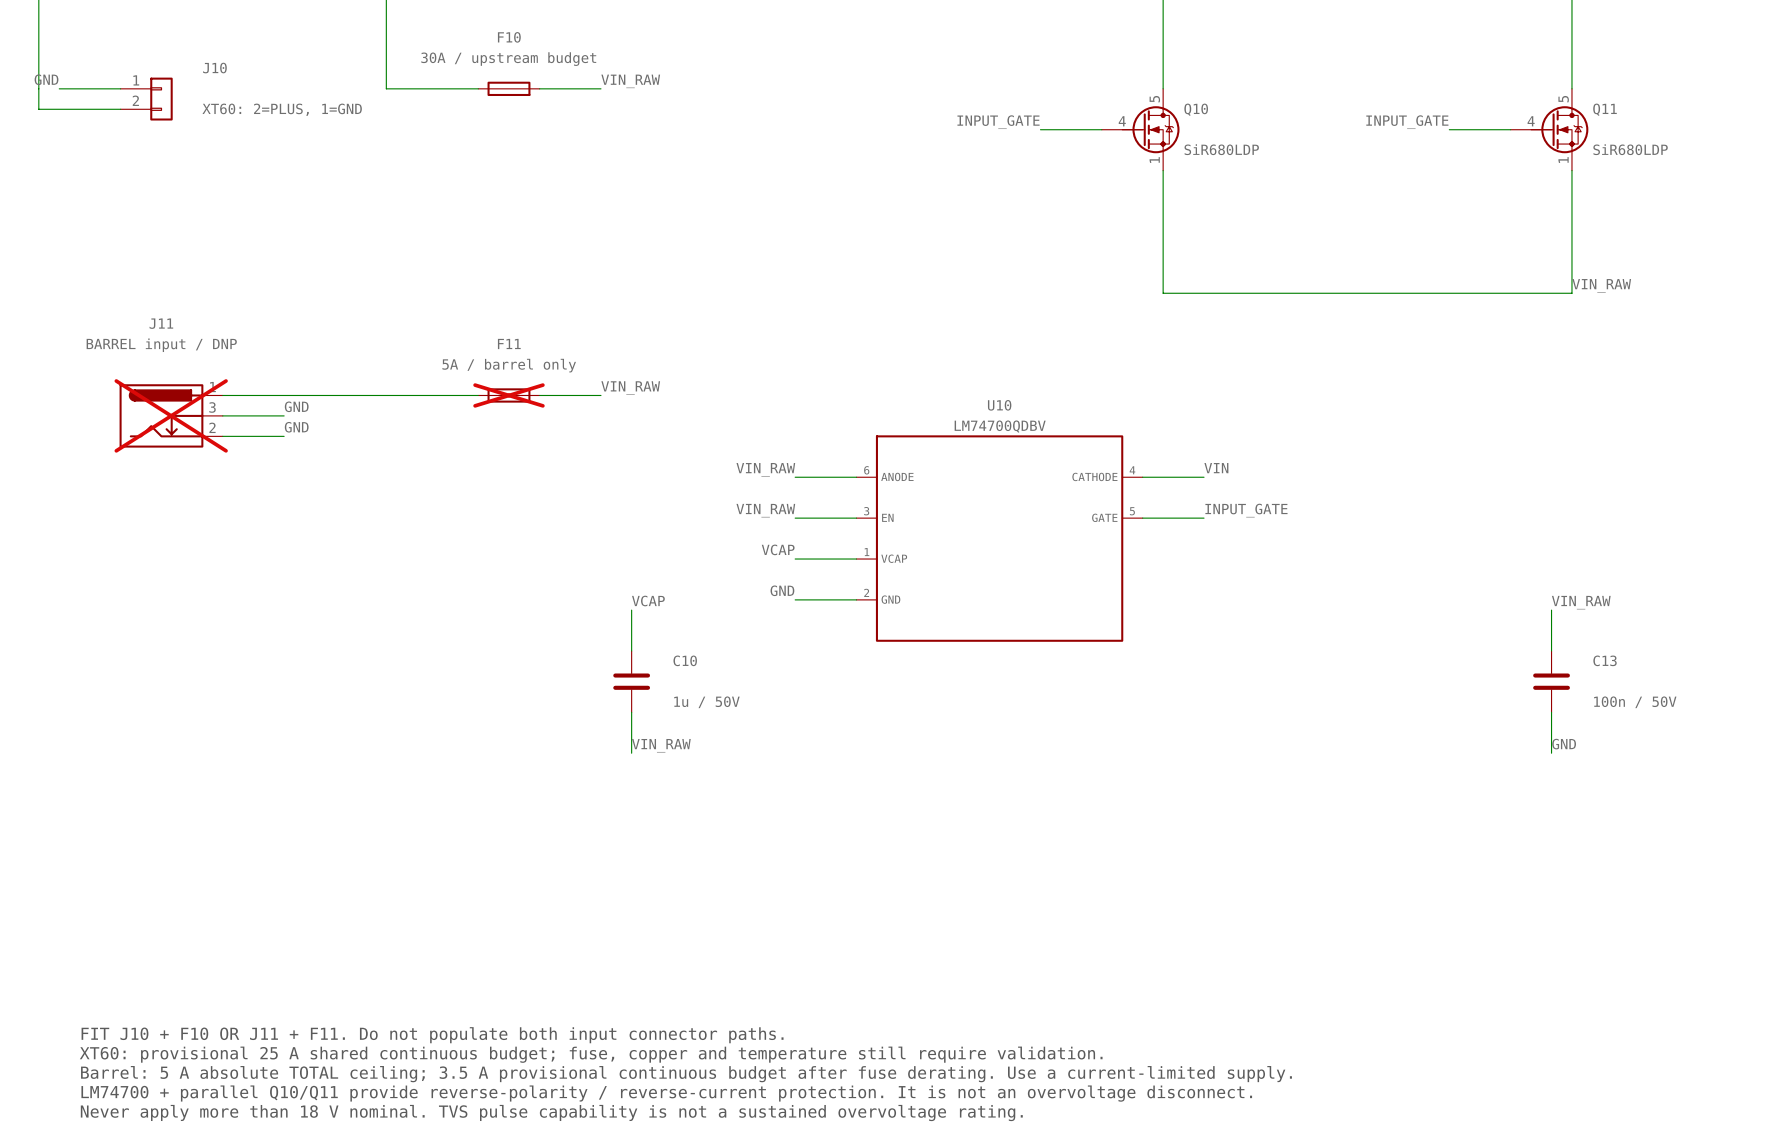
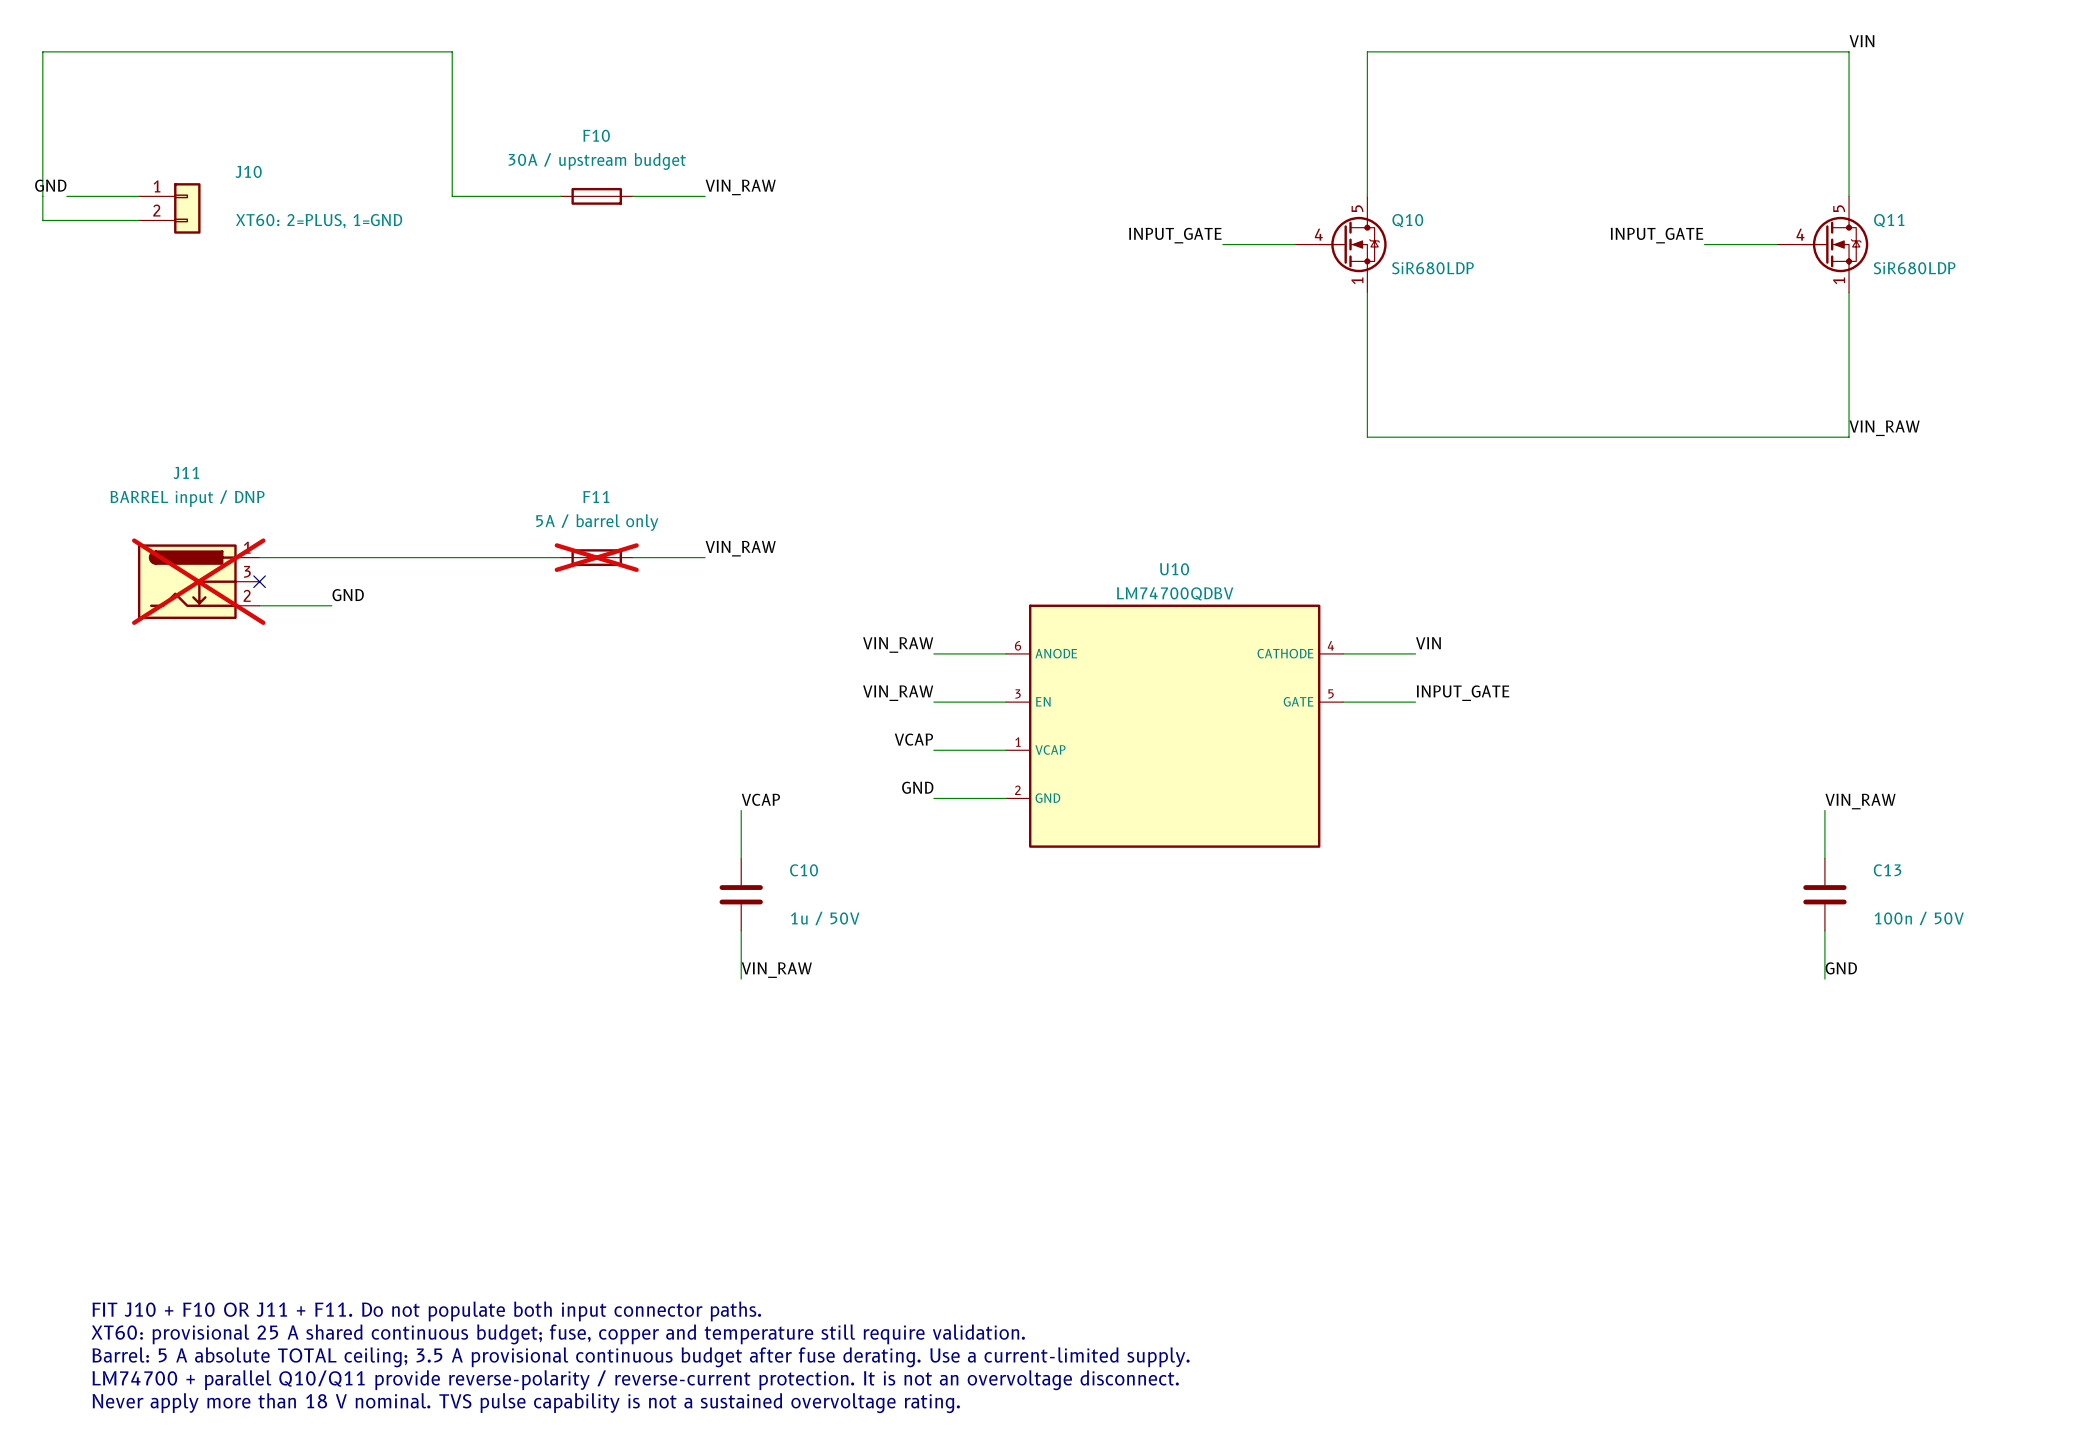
label: GND (296, 406) -> none
wire: (222, 415) (284, 415) -> none
no-connect mark: none -> (259, 581)

